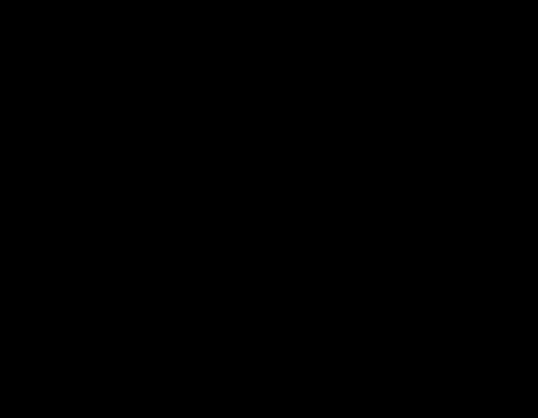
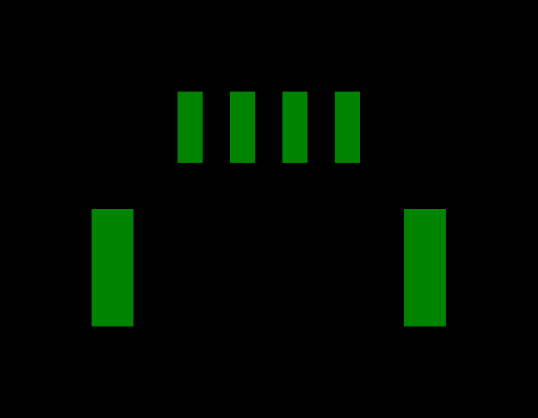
part: none -> (268, 209)

